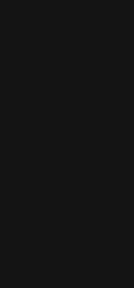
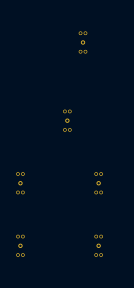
part: none -> (83, 42)
part: none -> (67, 120)
part: none -> (20, 183)
part: none -> (98, 183)
part: none -> (20, 245)
part: none -> (98, 245)

